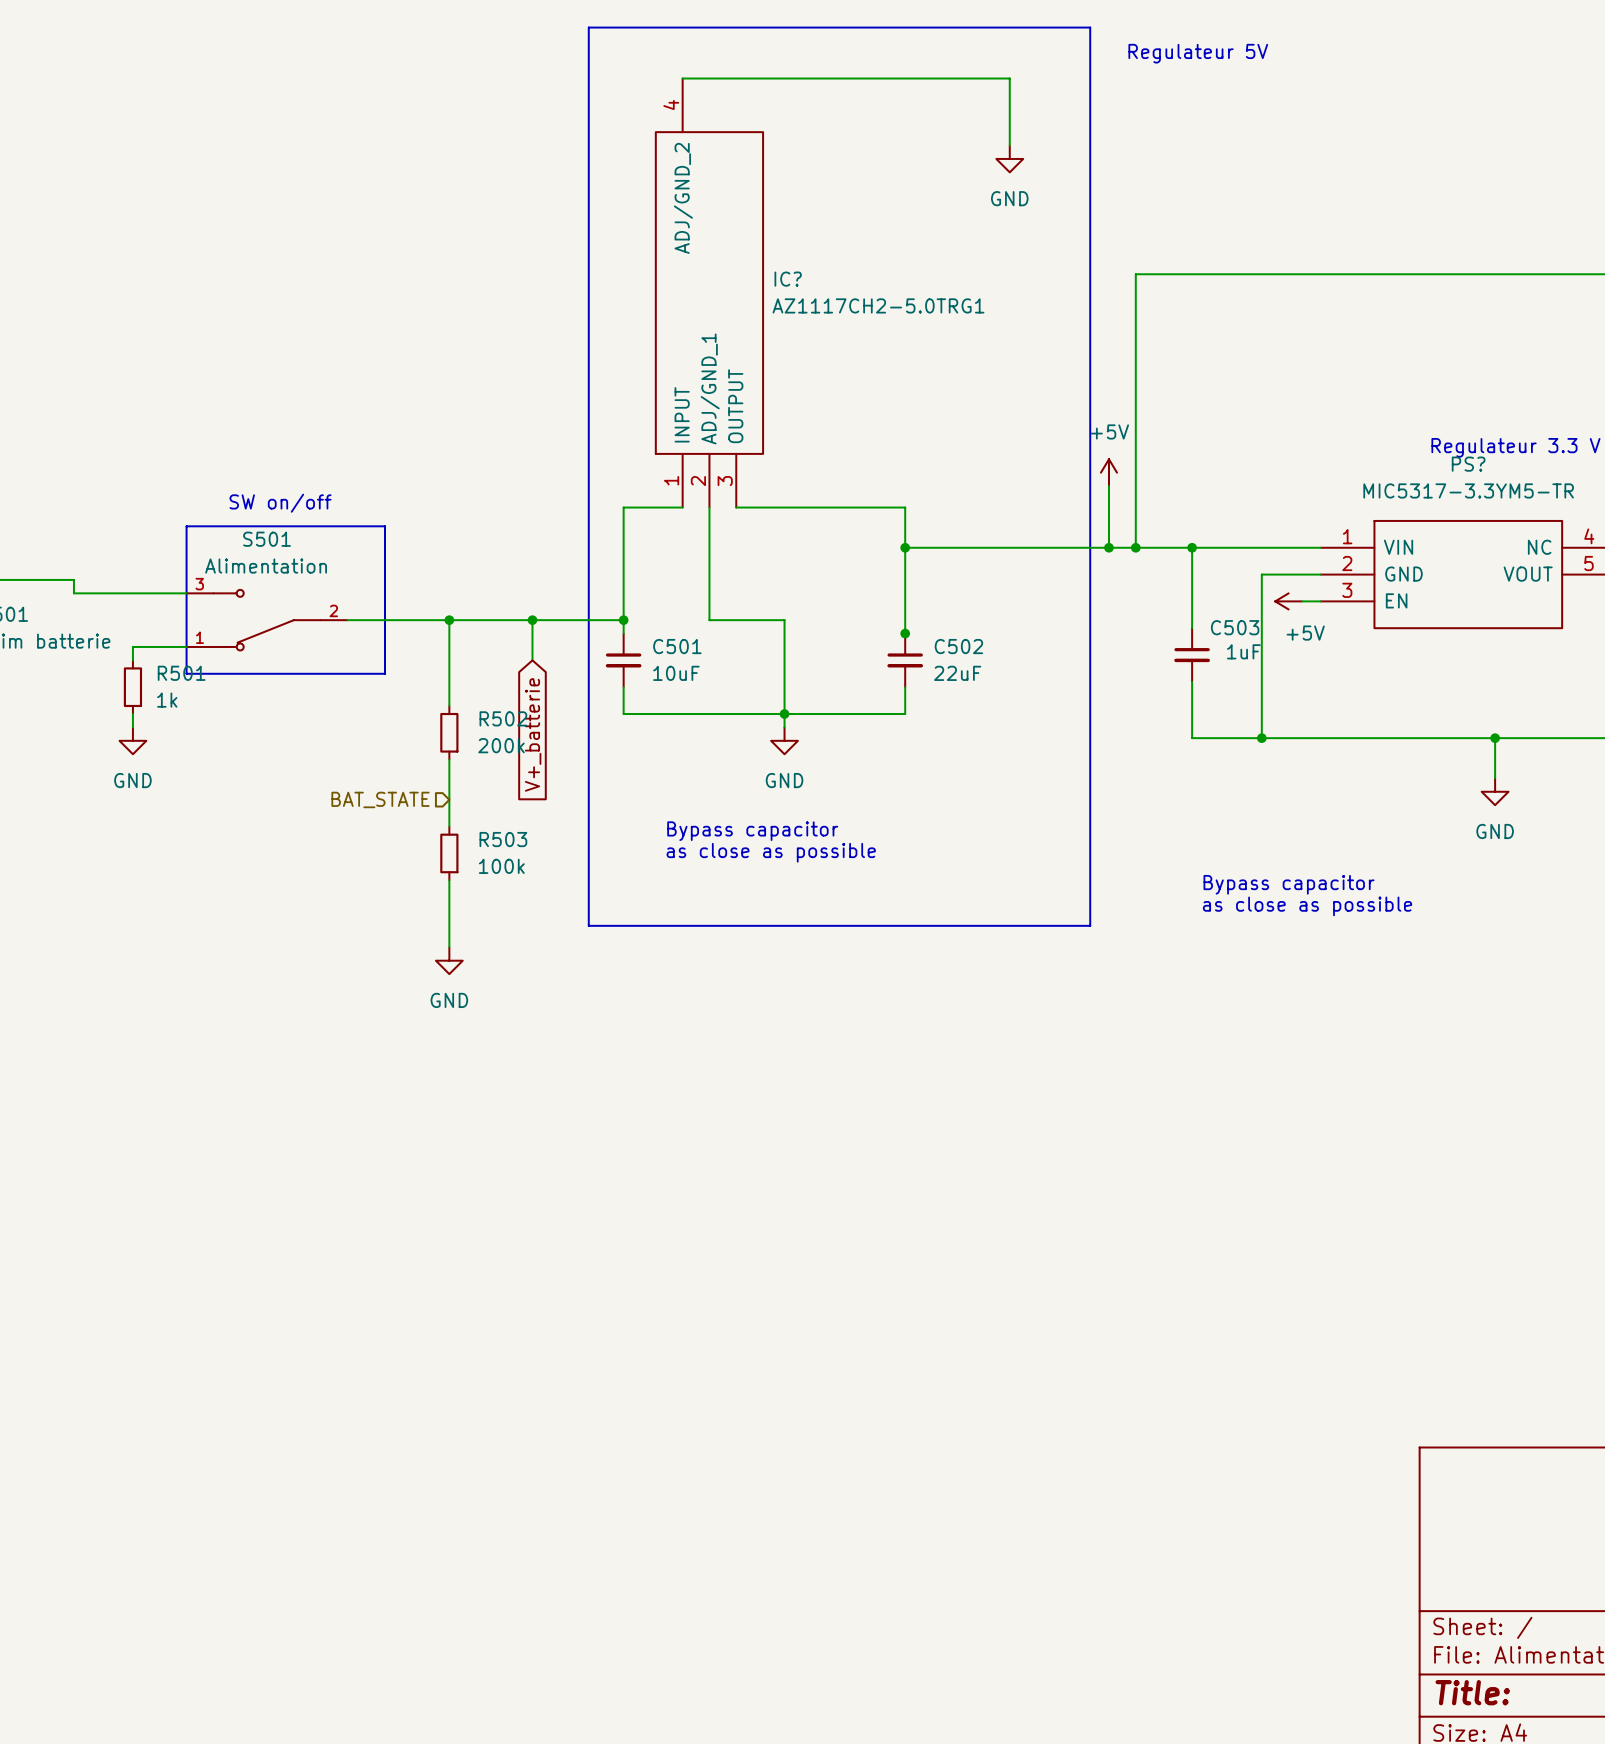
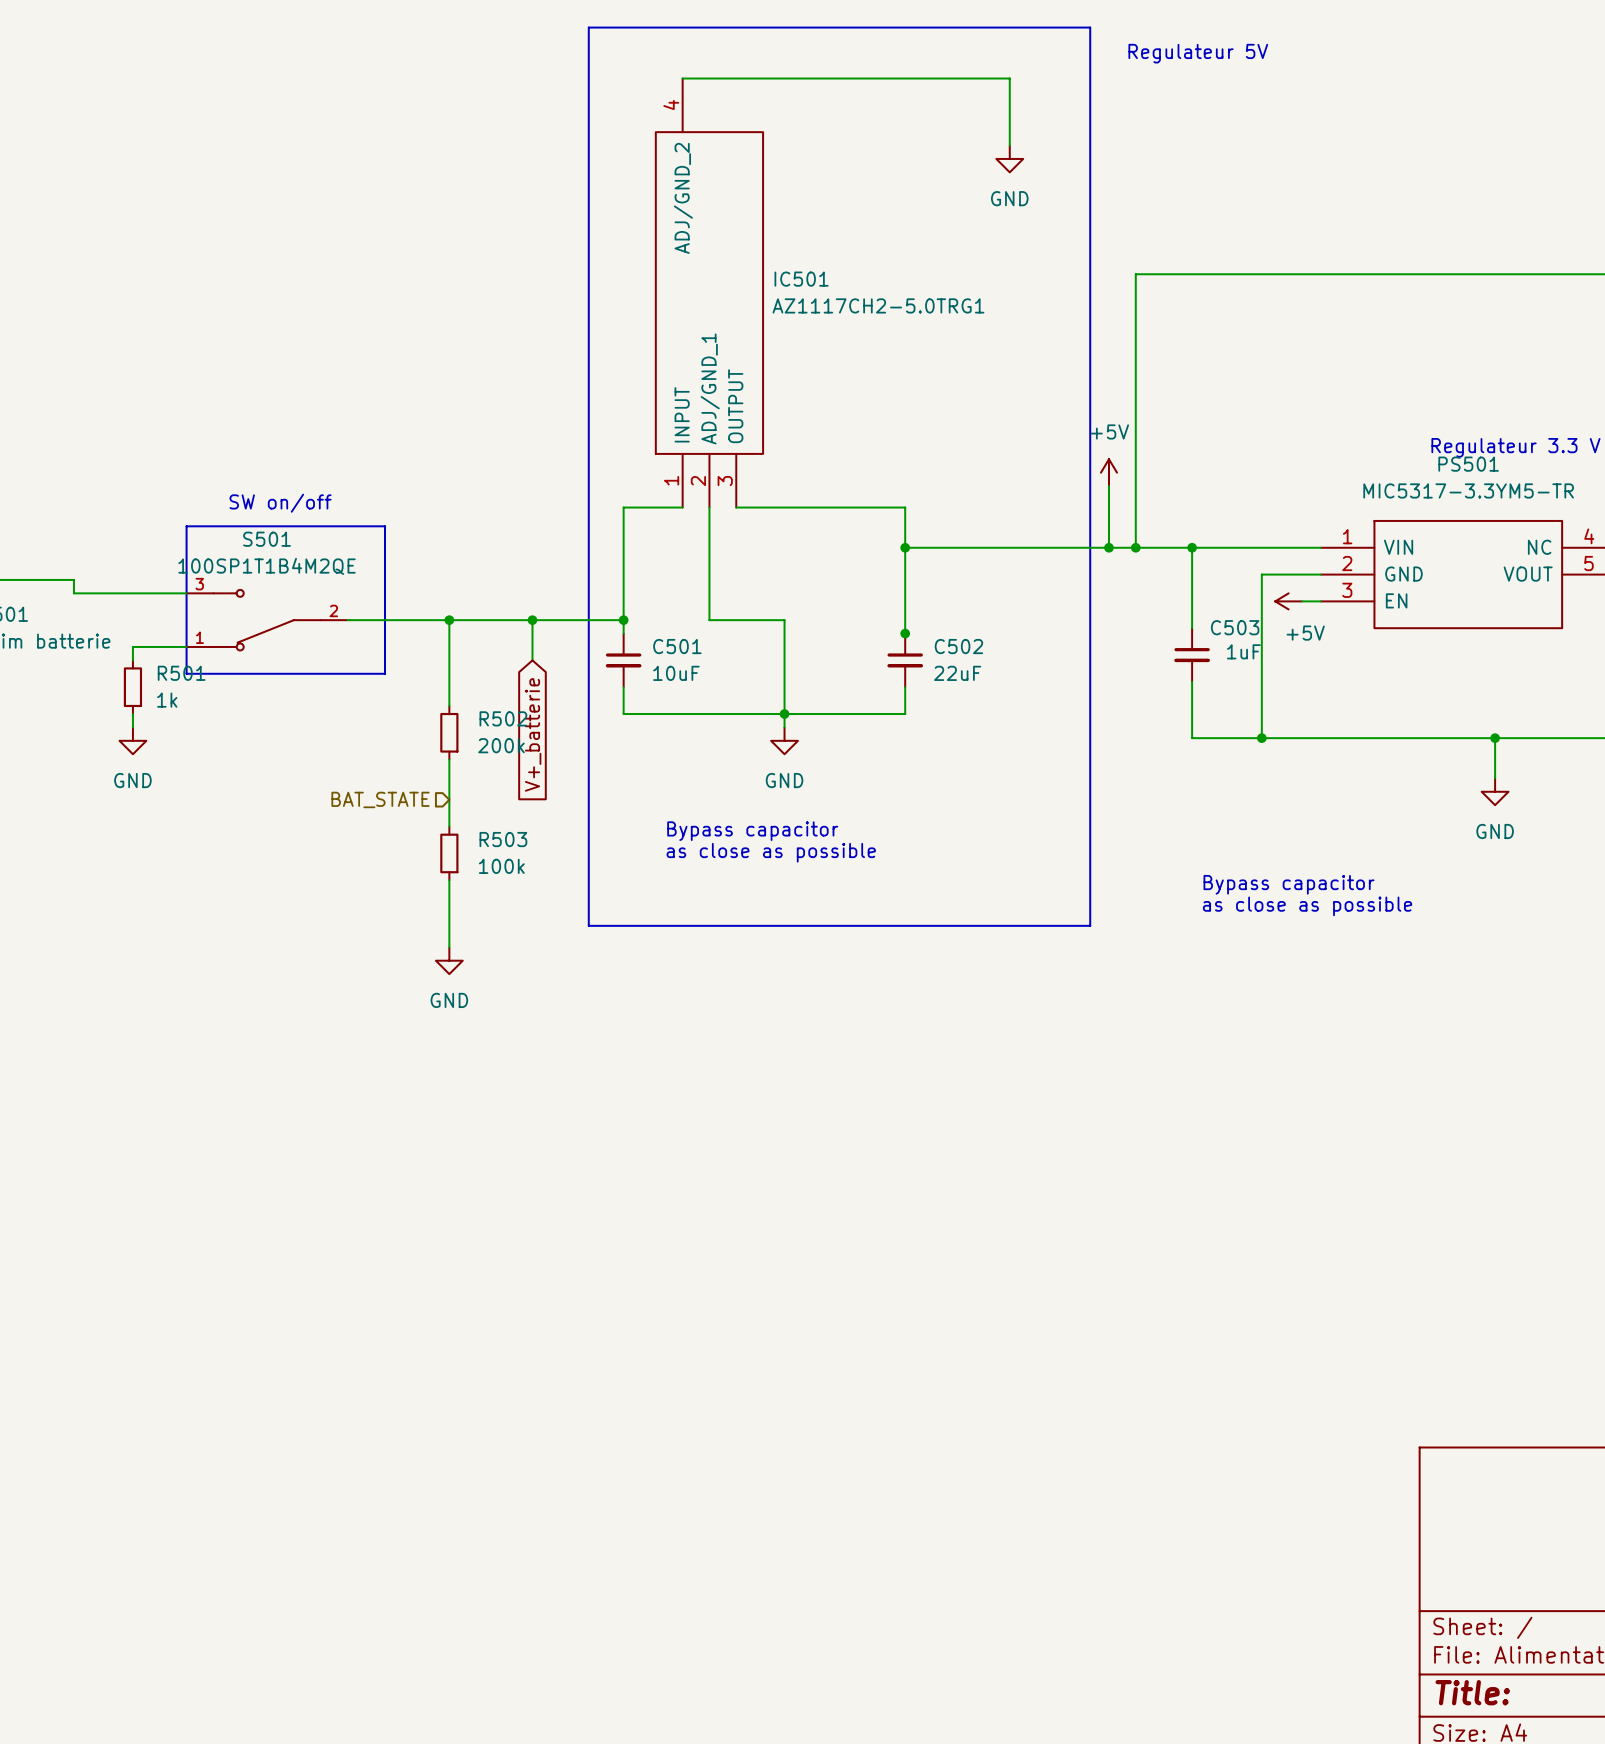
IC? name: IC? (788, 279) -> IC501 (801, 279)
PS? name: PS? (1468, 464) -> PS501 (1468, 464)
S501 value: Alimentation (266, 566) -> 100SP1T1B4M2QE (267, 566)

